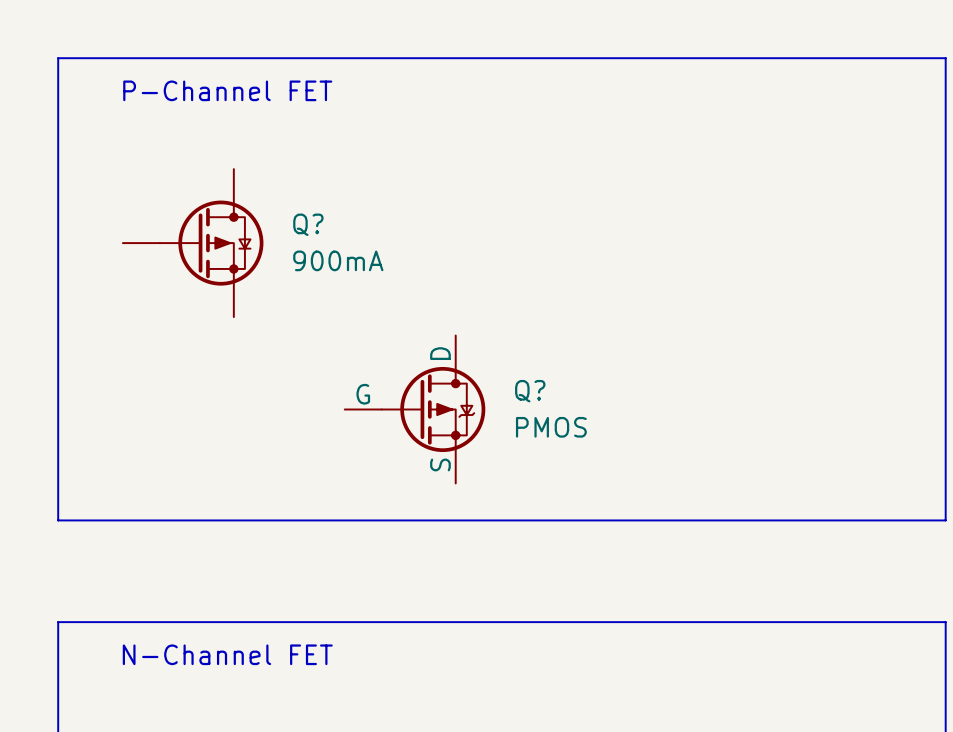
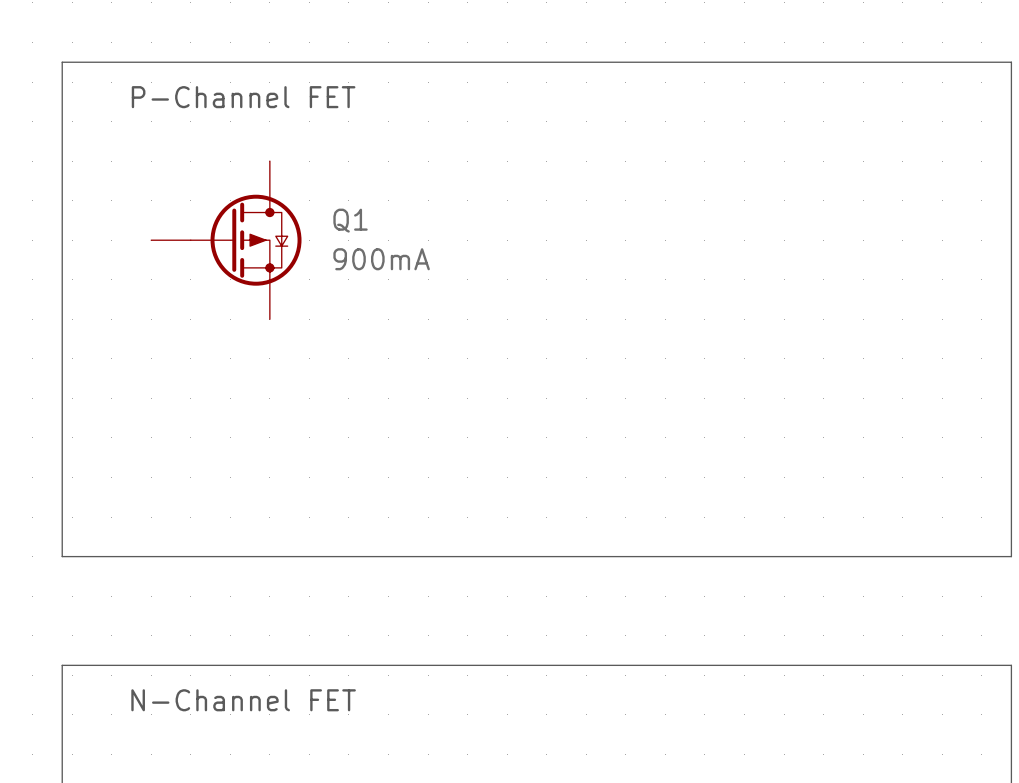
Q1: none -> 900mA (226, 240)
Q?: 900mA (193, 243) -> none
Q?: PMOS (415, 409) -> none

